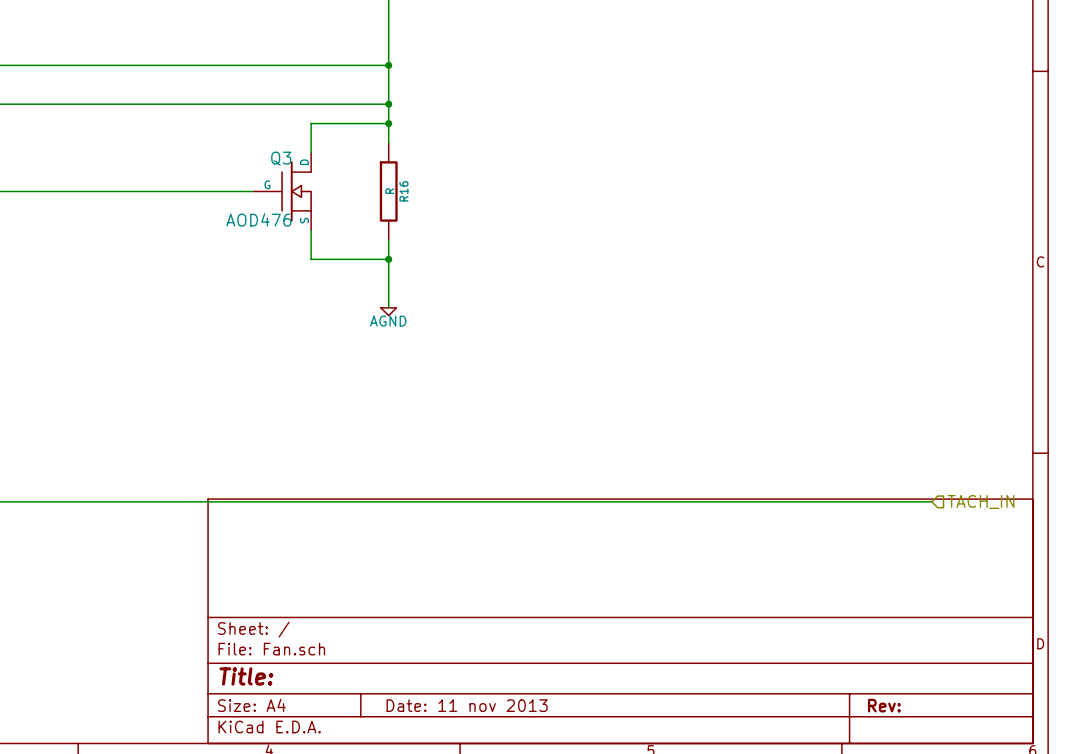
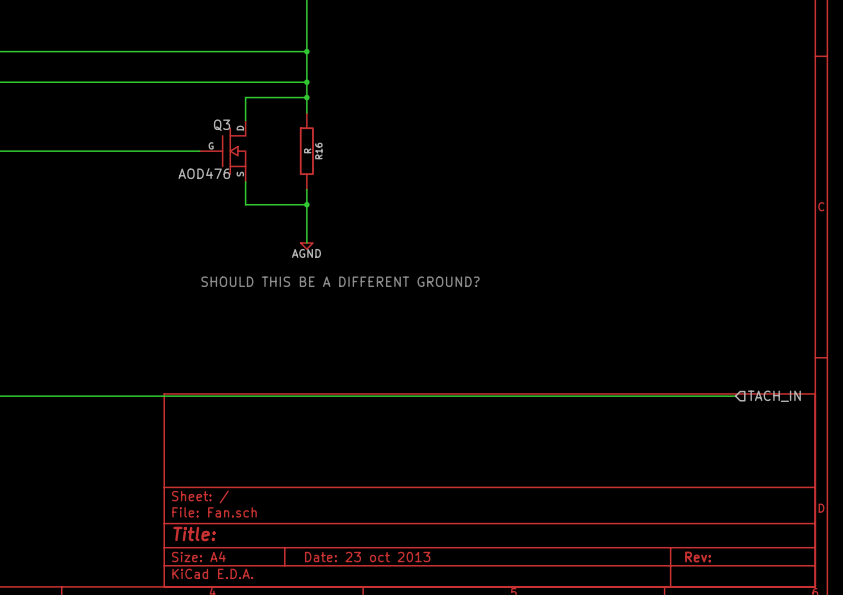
text: none -> SHOULD THIS BE A DIFFERENT GROUND? (340, 281)
title block: Date: 11 nov 2013 (467, 705) -> Date: 23 oct 2013 (367, 557)

